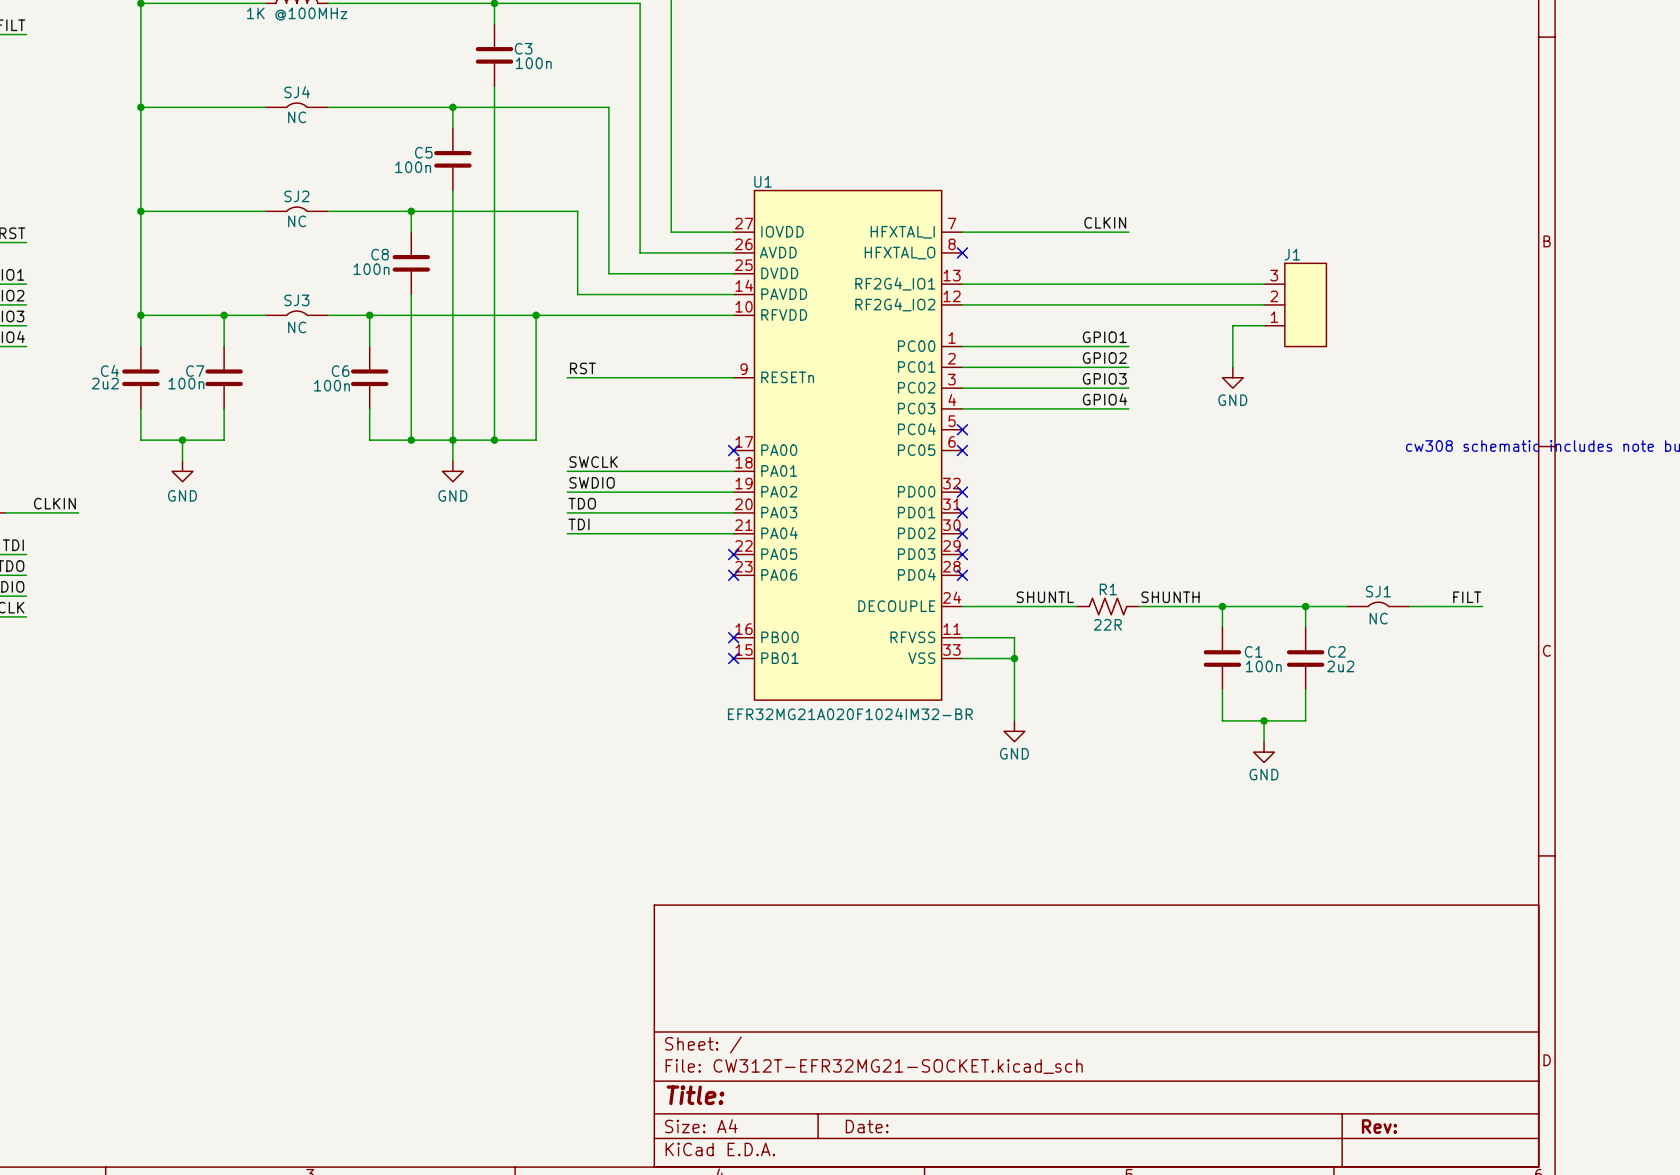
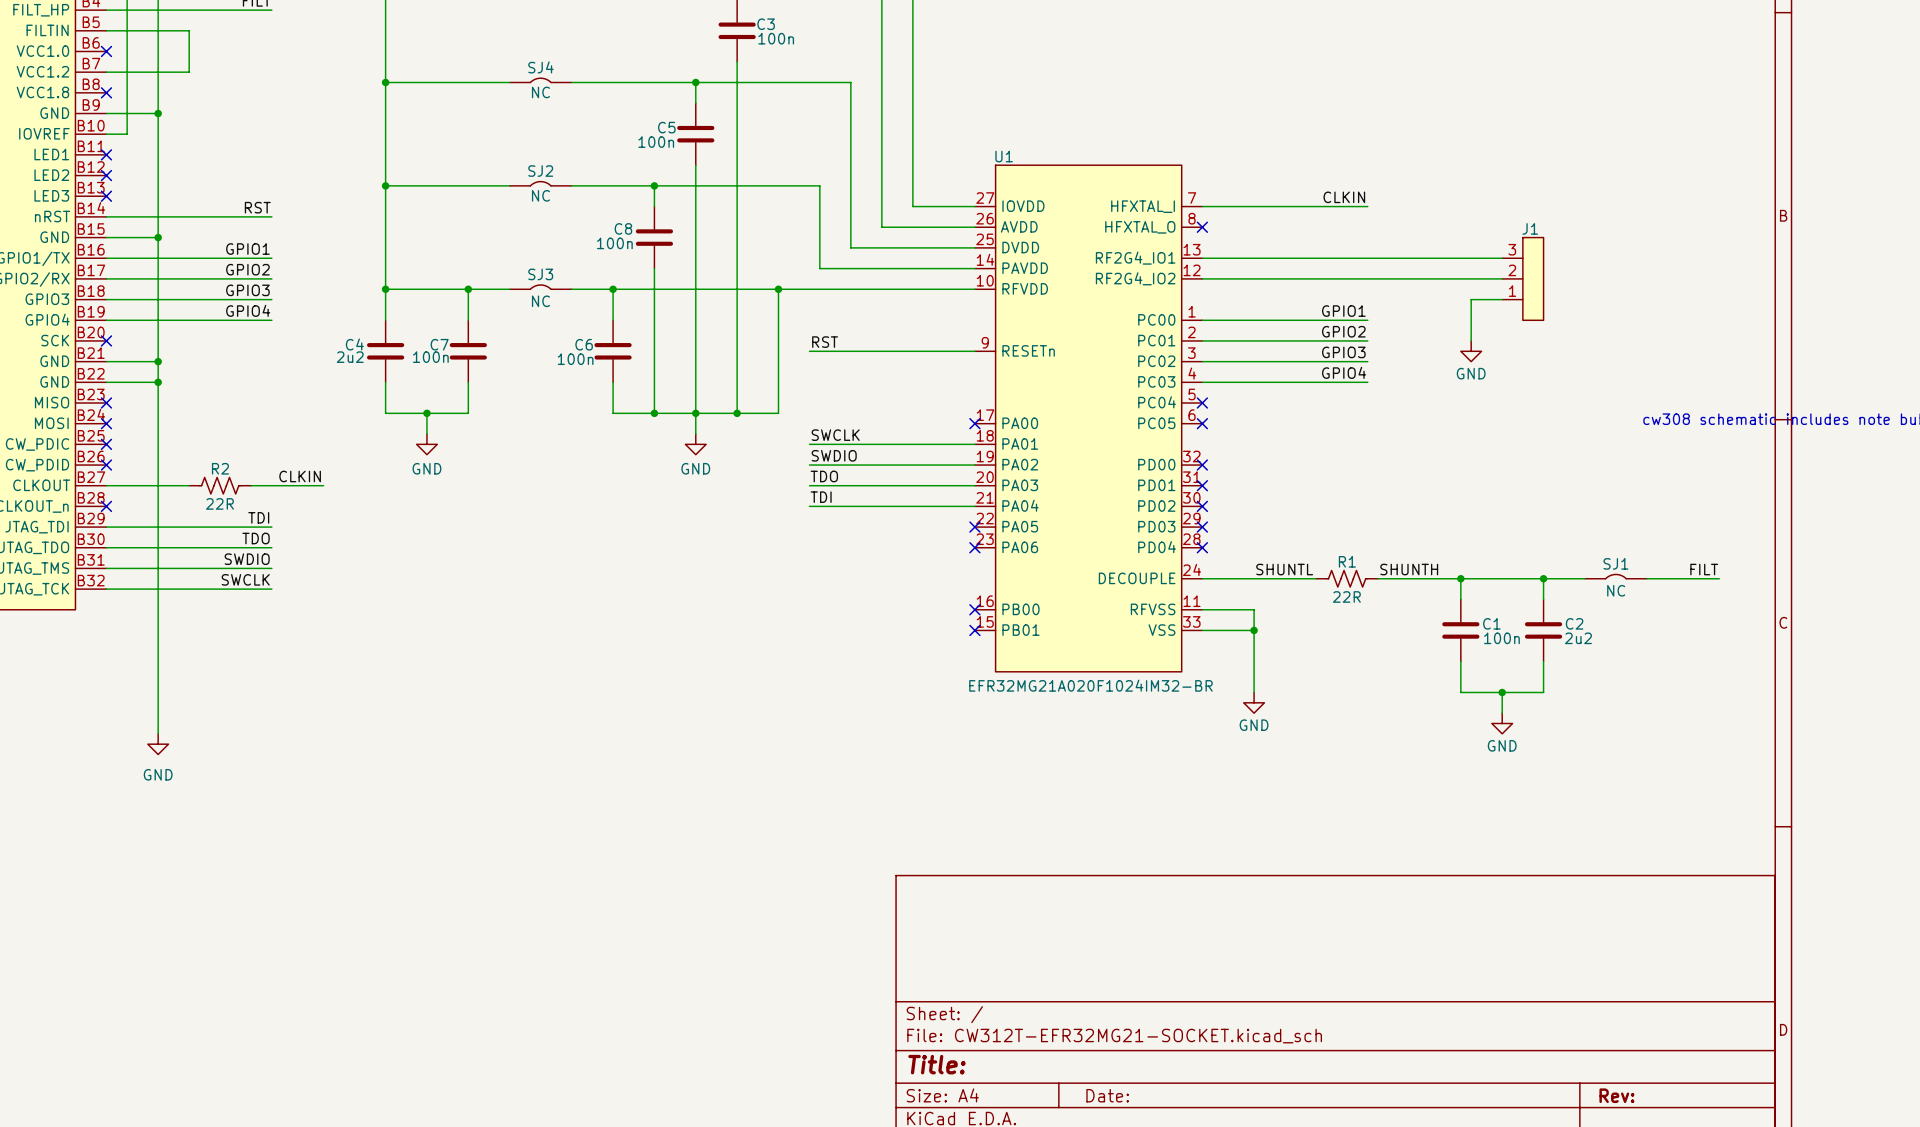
J1 symbol: [1264, 263, 1327, 347] -> [1502, 237, 1544, 321]

